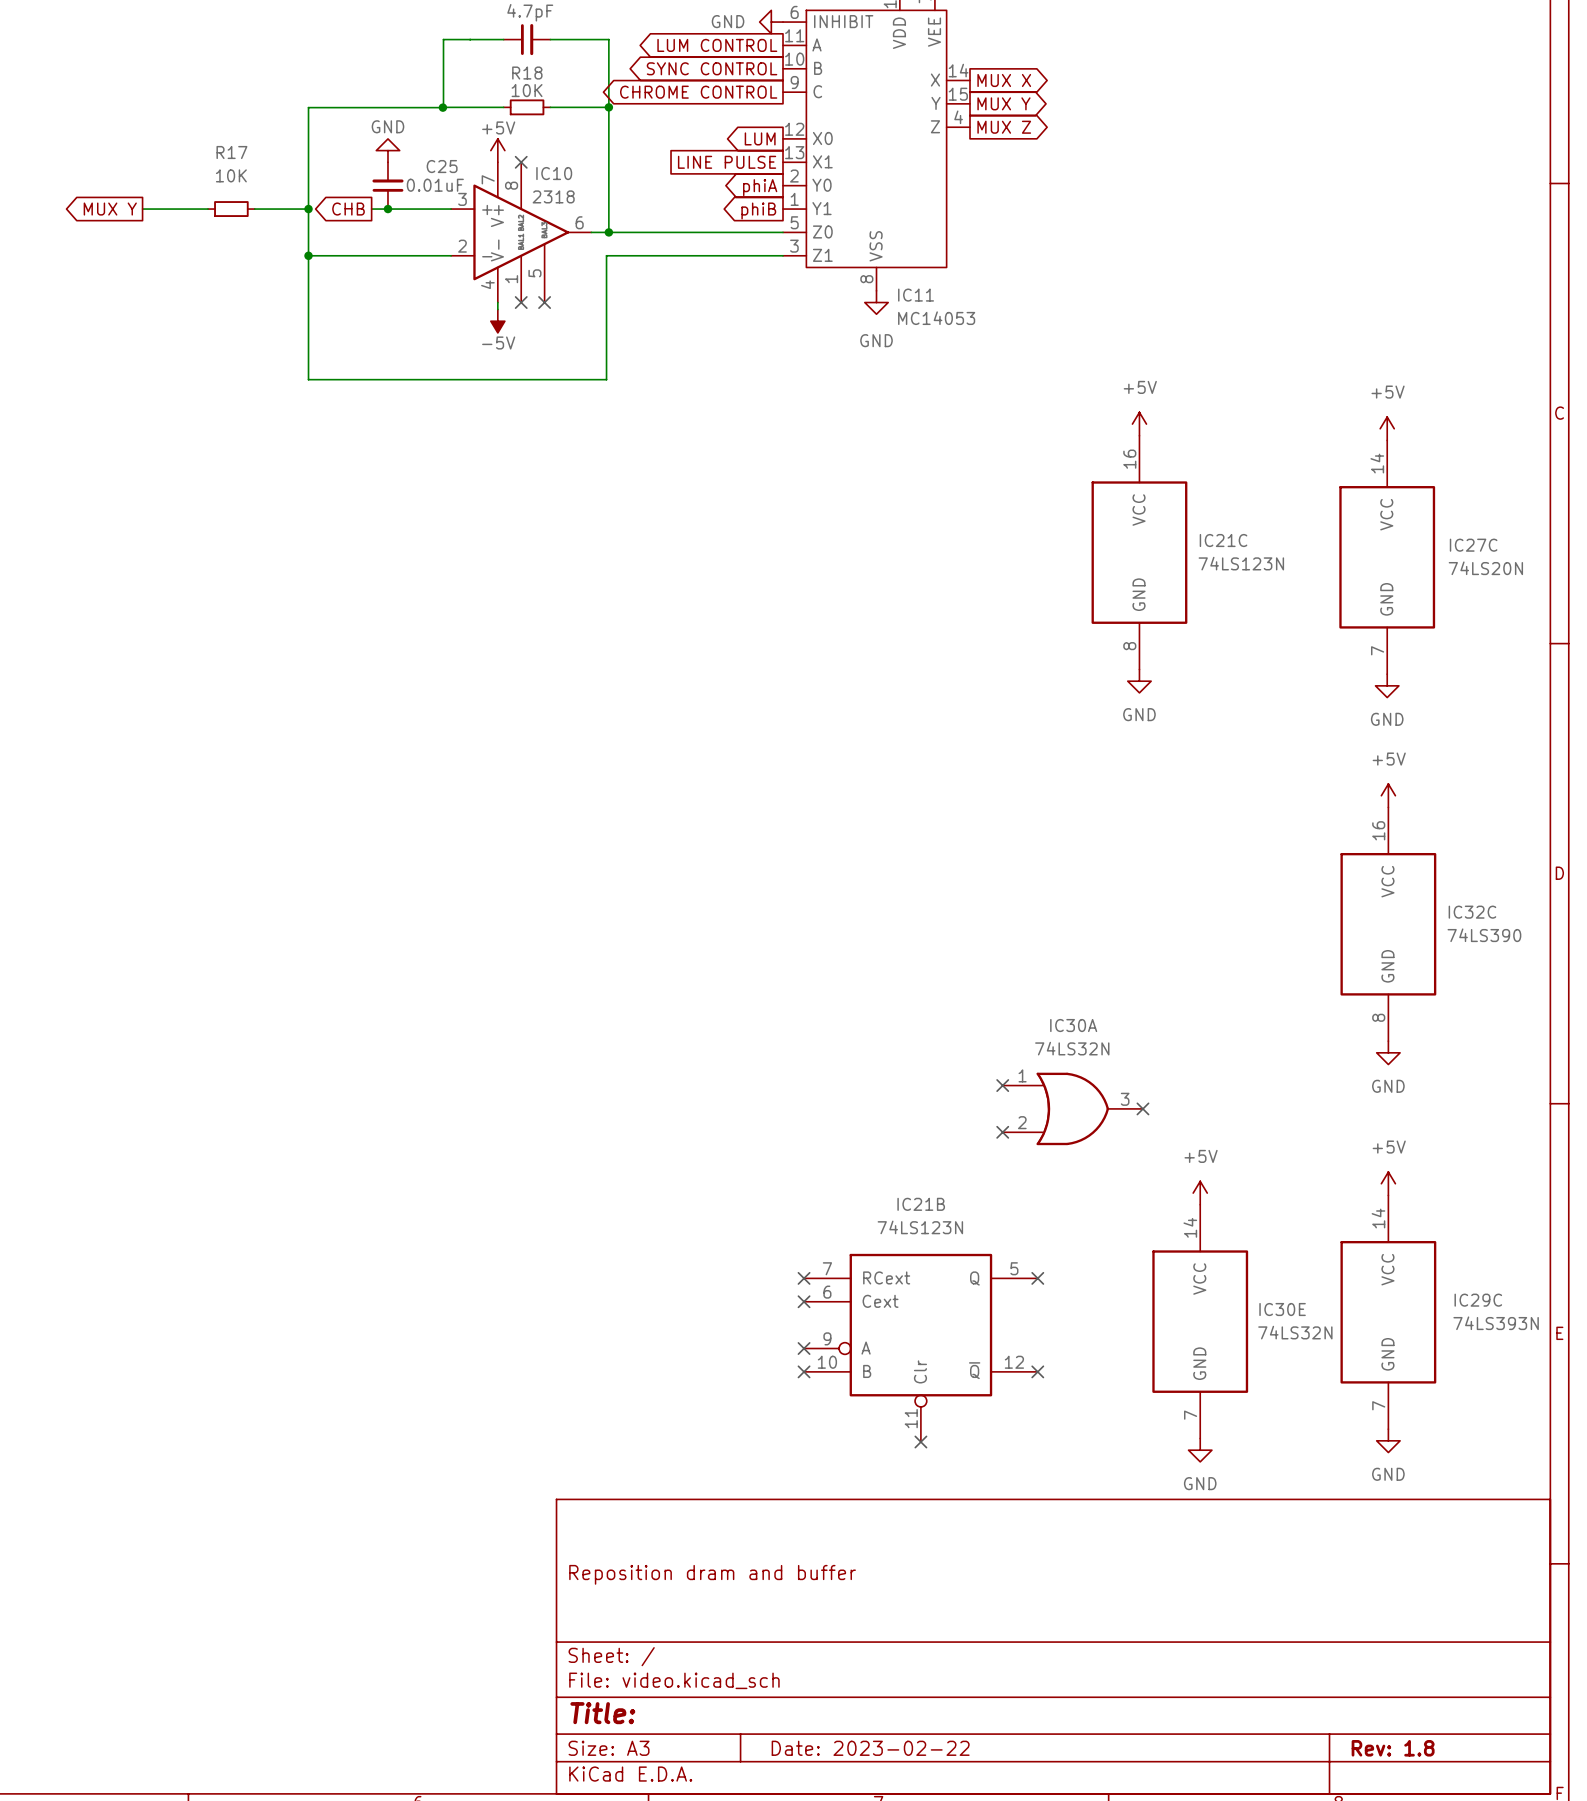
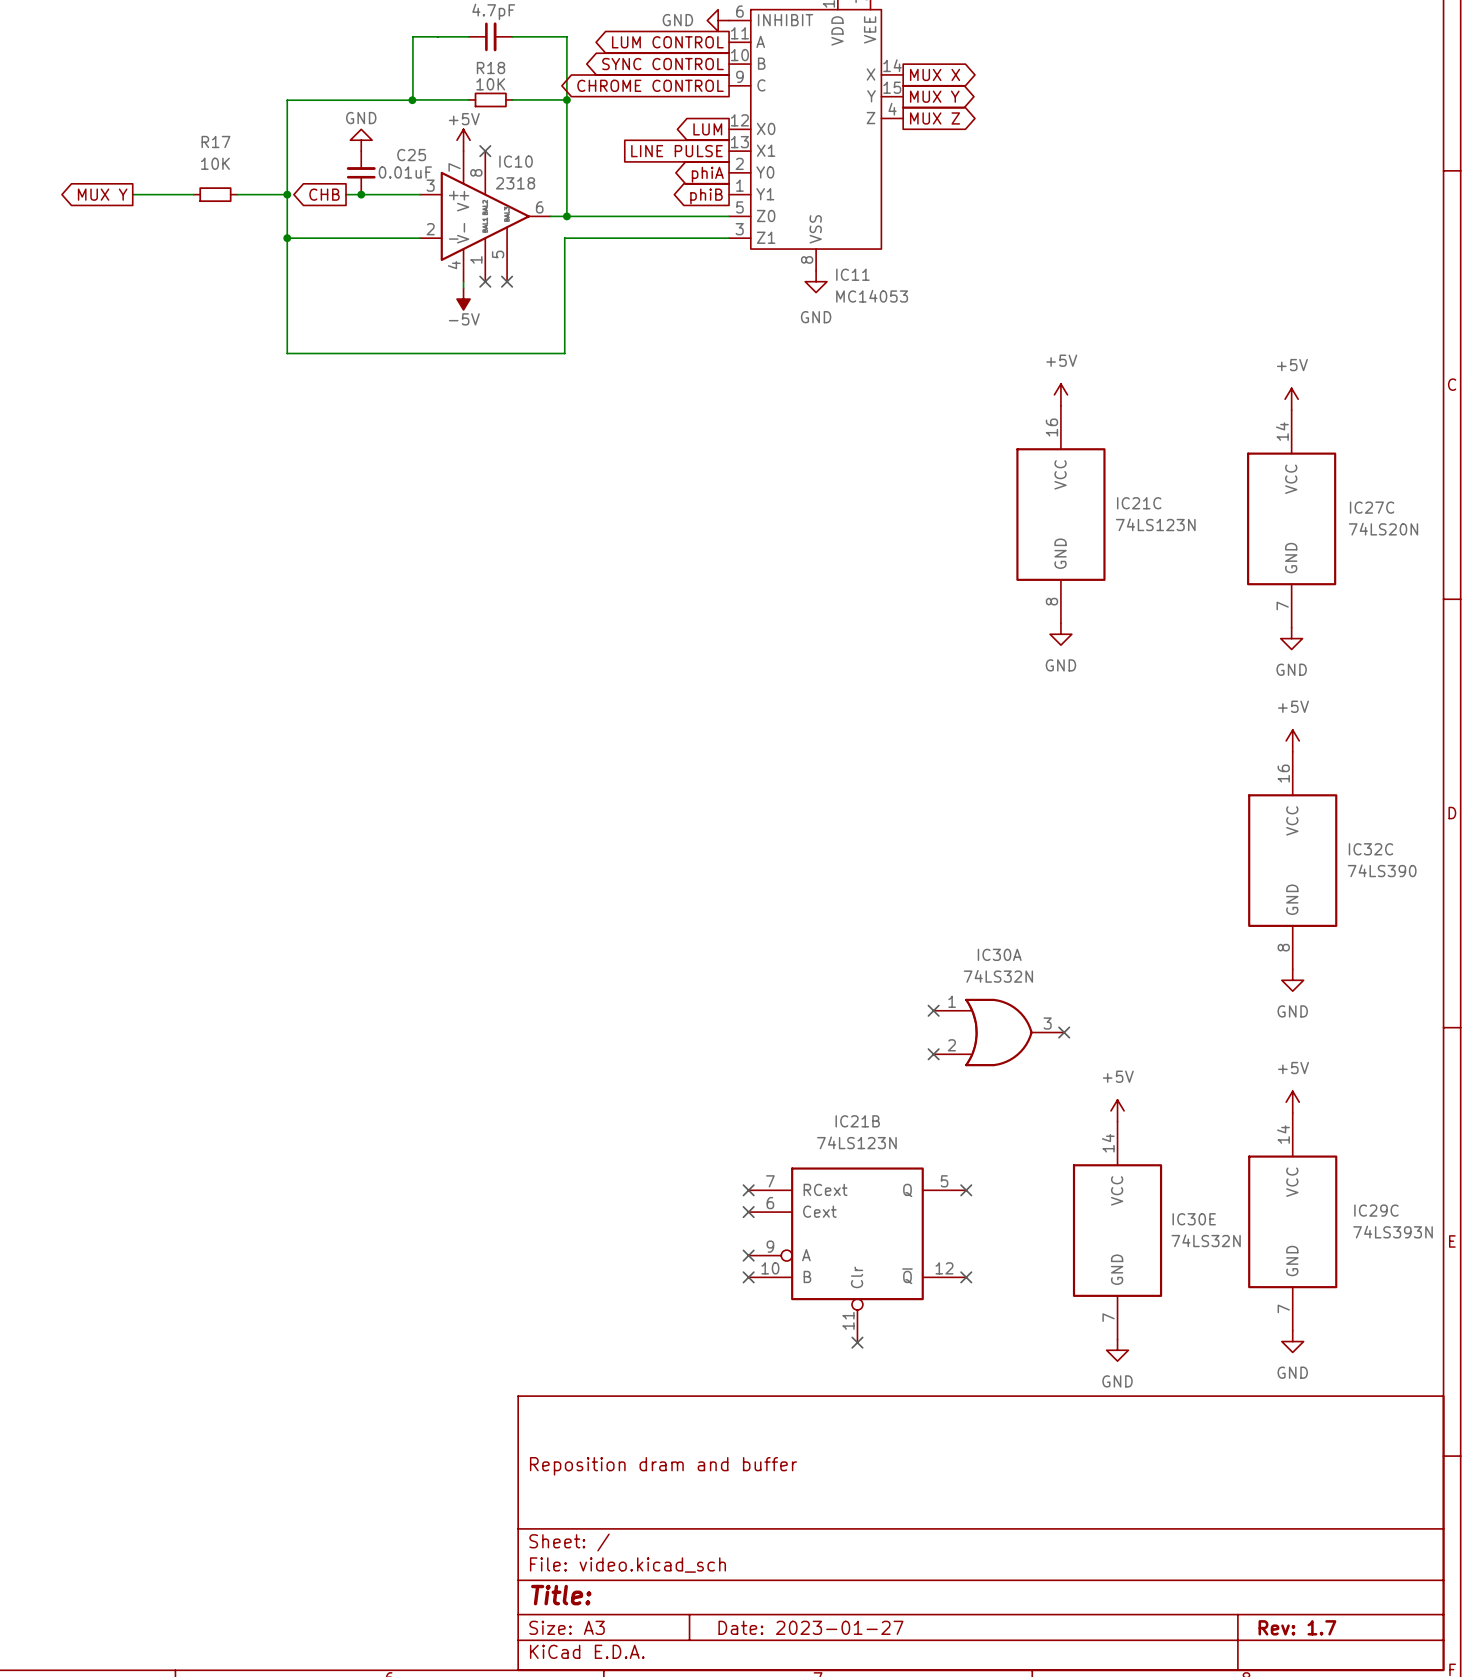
title block: Date: 2023-02-22 (870, 1748) -> Date: 2023-01-27 (810, 1627)
title block: Rev: 1.8 (1393, 1748) -> Rev: 1.7 (1297, 1627)

